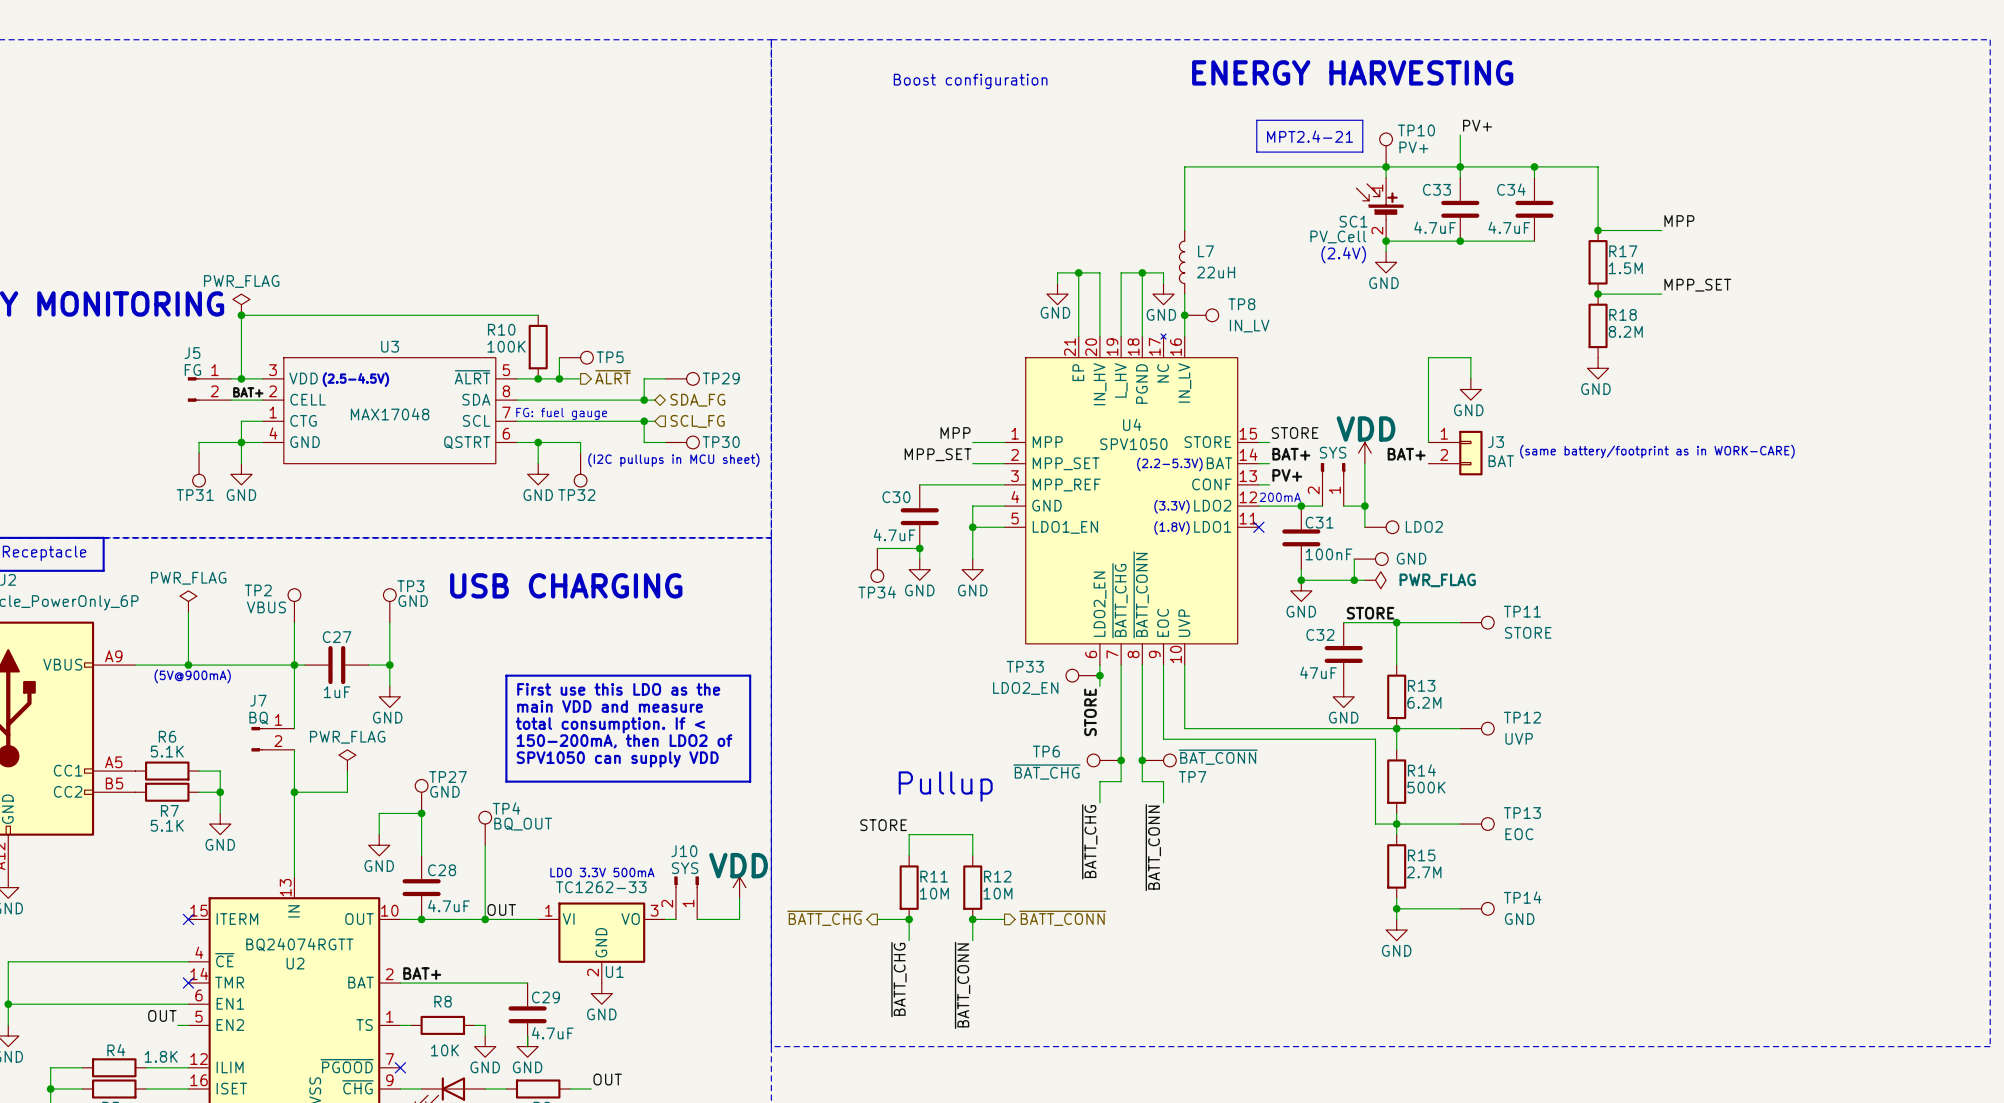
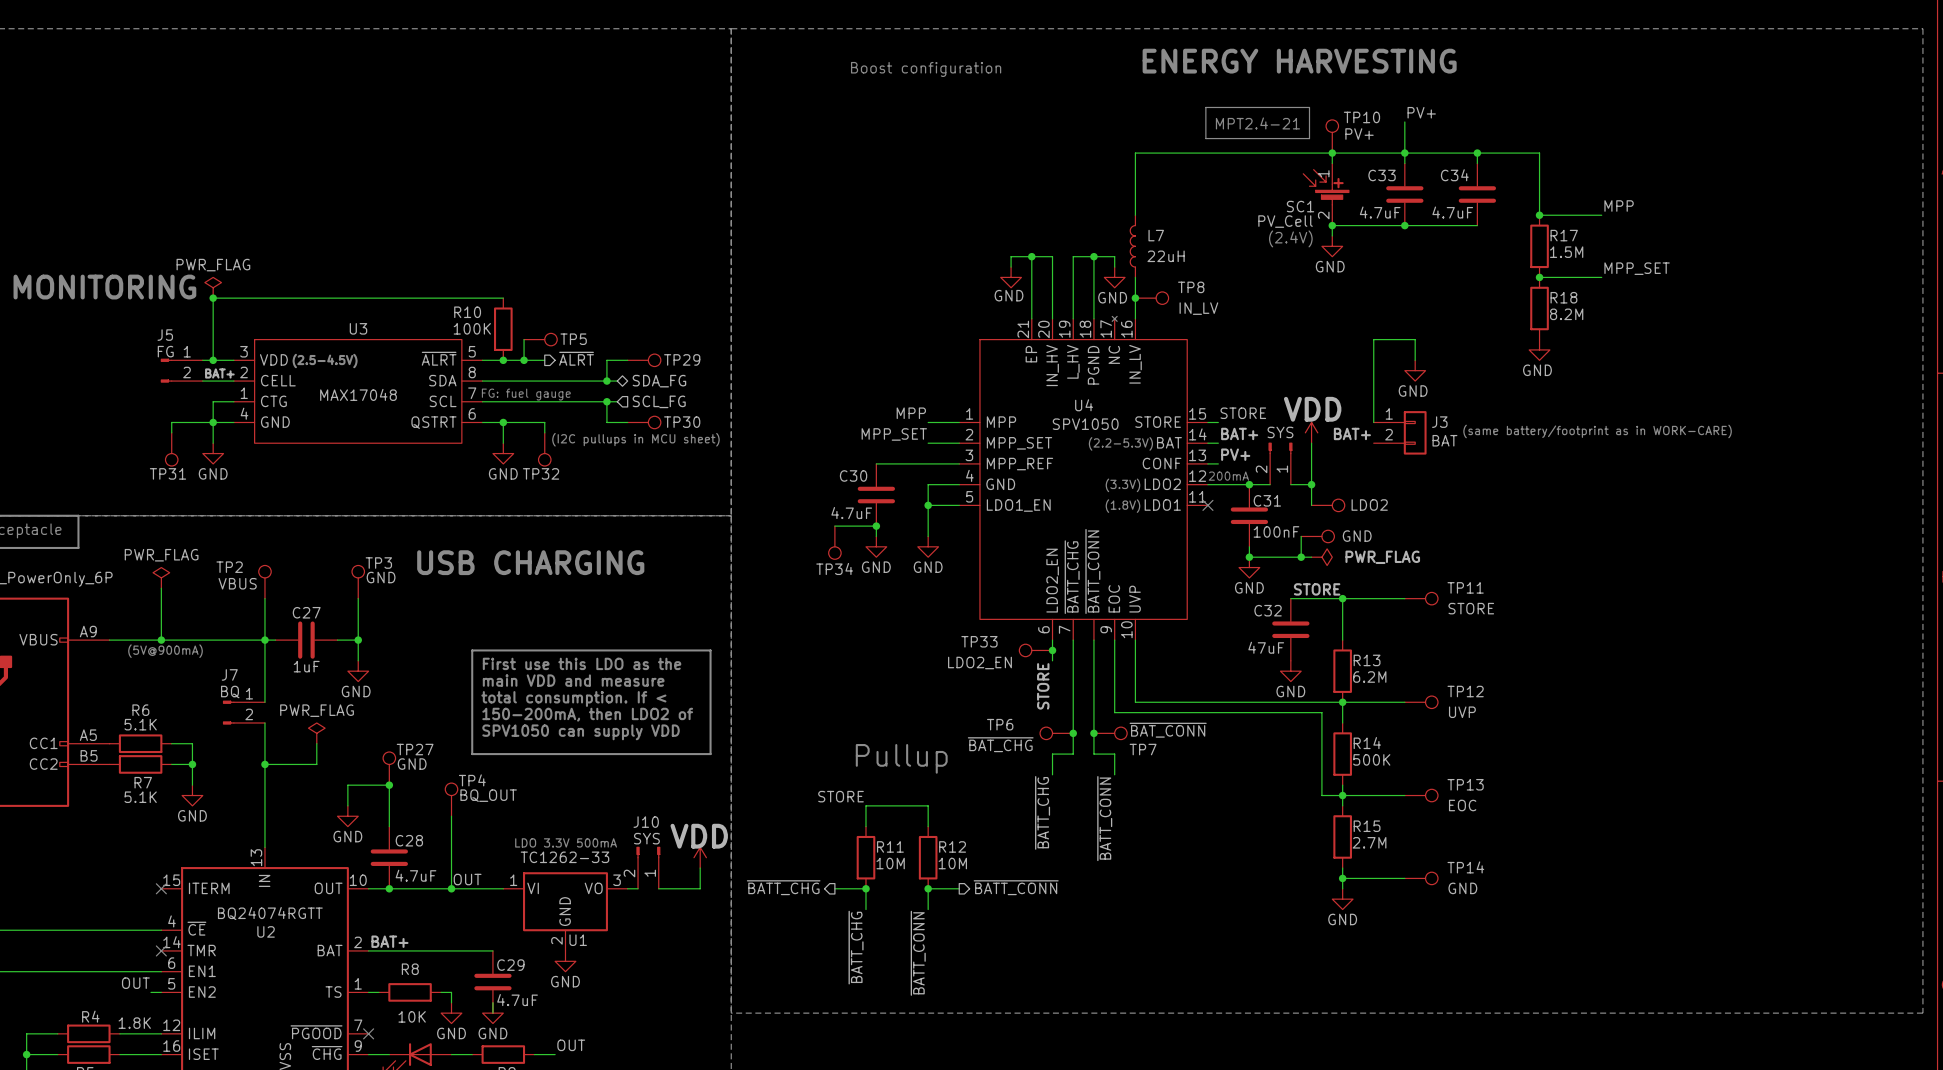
U4 pin number: 8 (1133, 654) -> none

